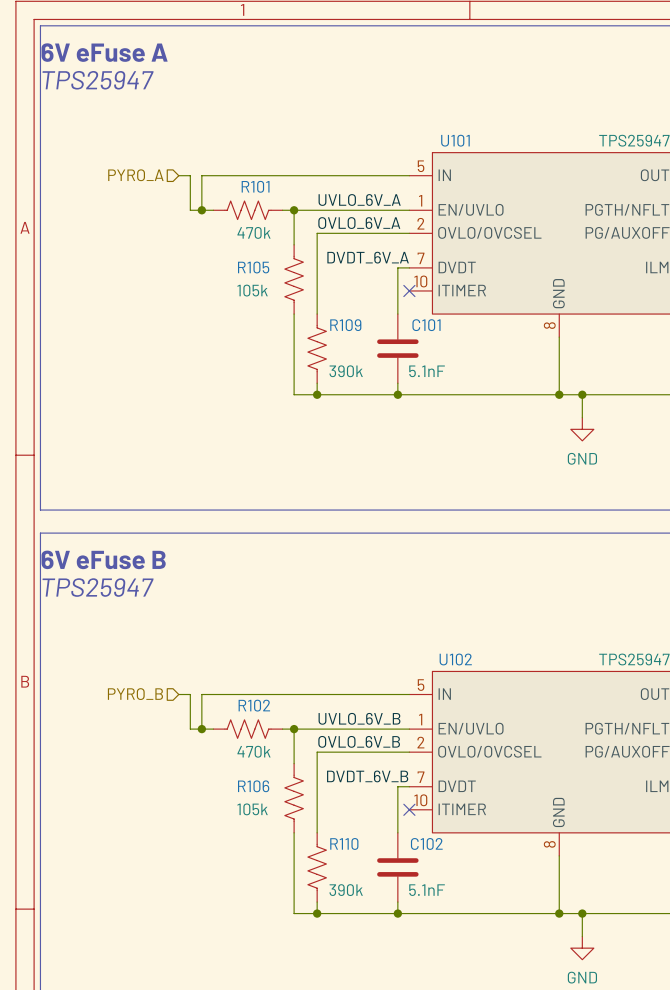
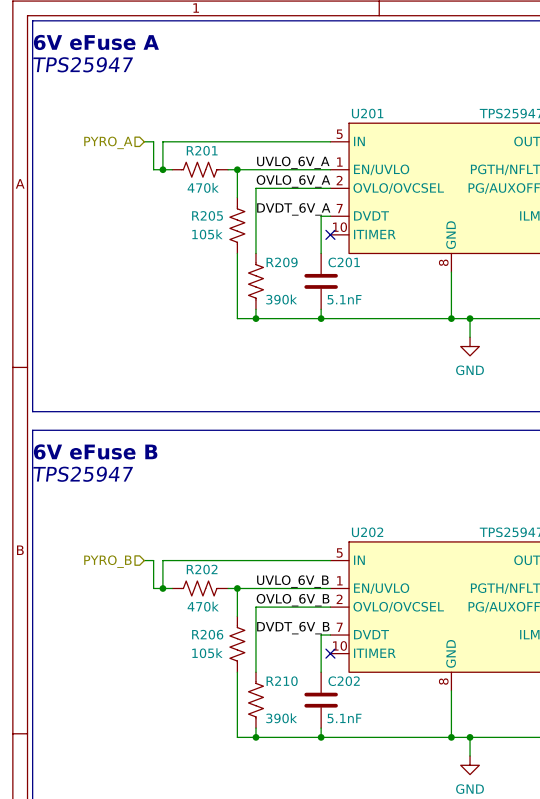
U101 name: U101 (455, 140) -> U201 (367, 113)
R101 name: R101 (255, 186) -> R201 (202, 150)
R105 name: R105 (253, 267) -> R205 (207, 215)
R109 name: R109 (345, 325) -> R209 (282, 262)
C101 name: C101 (426, 325) -> C201 (344, 262)
U102 name: U102 (455, 659) -> U202 (367, 532)
R102 name: R102 (254, 705) -> R202 (202, 569)
R106 name: R106 (253, 786) -> R206 (207, 634)
R110 name: R110 (344, 843) -> R210 (282, 681)
C102 name: C102 (426, 843) -> C202 (344, 681)

